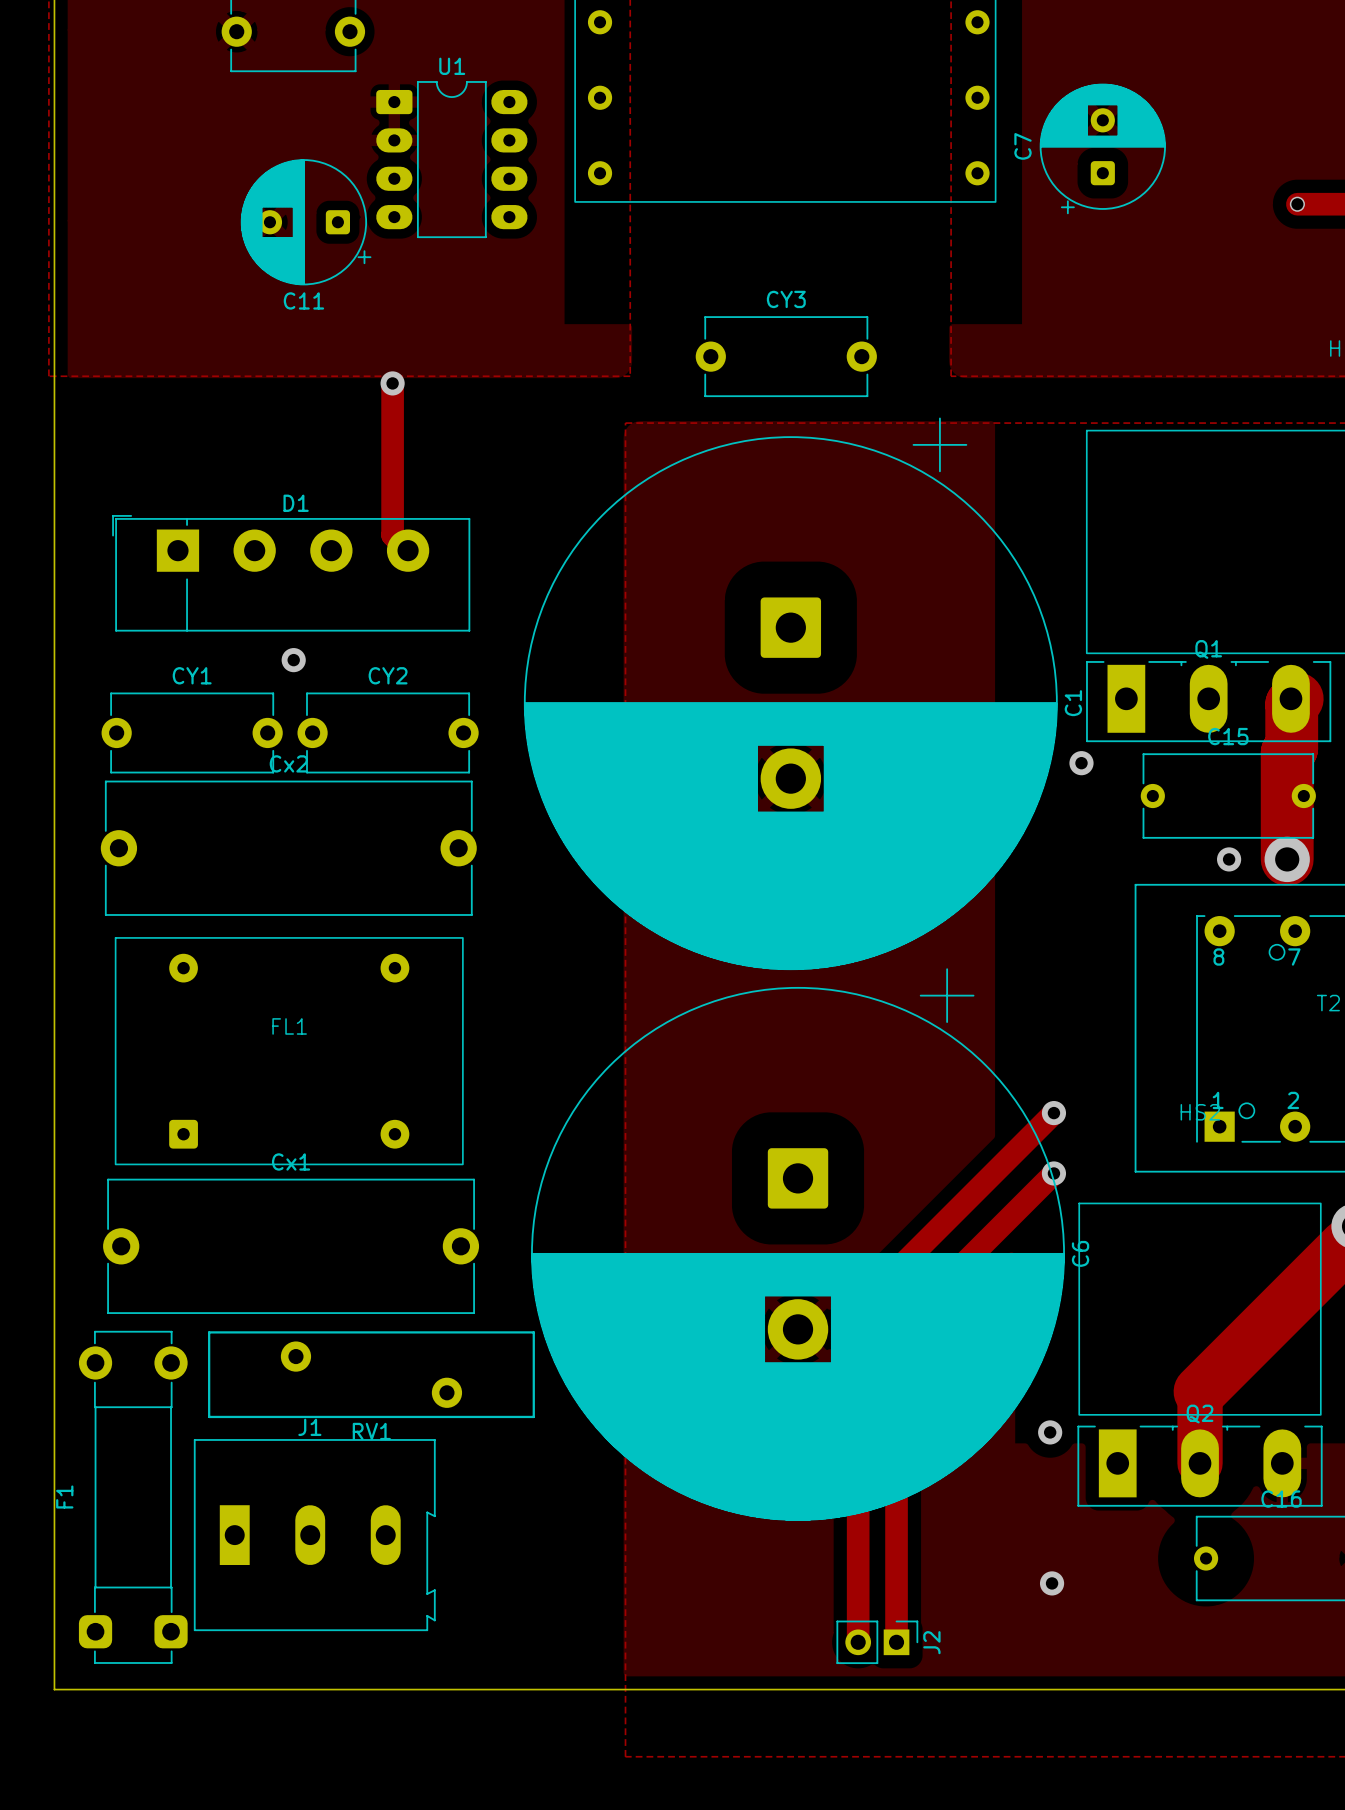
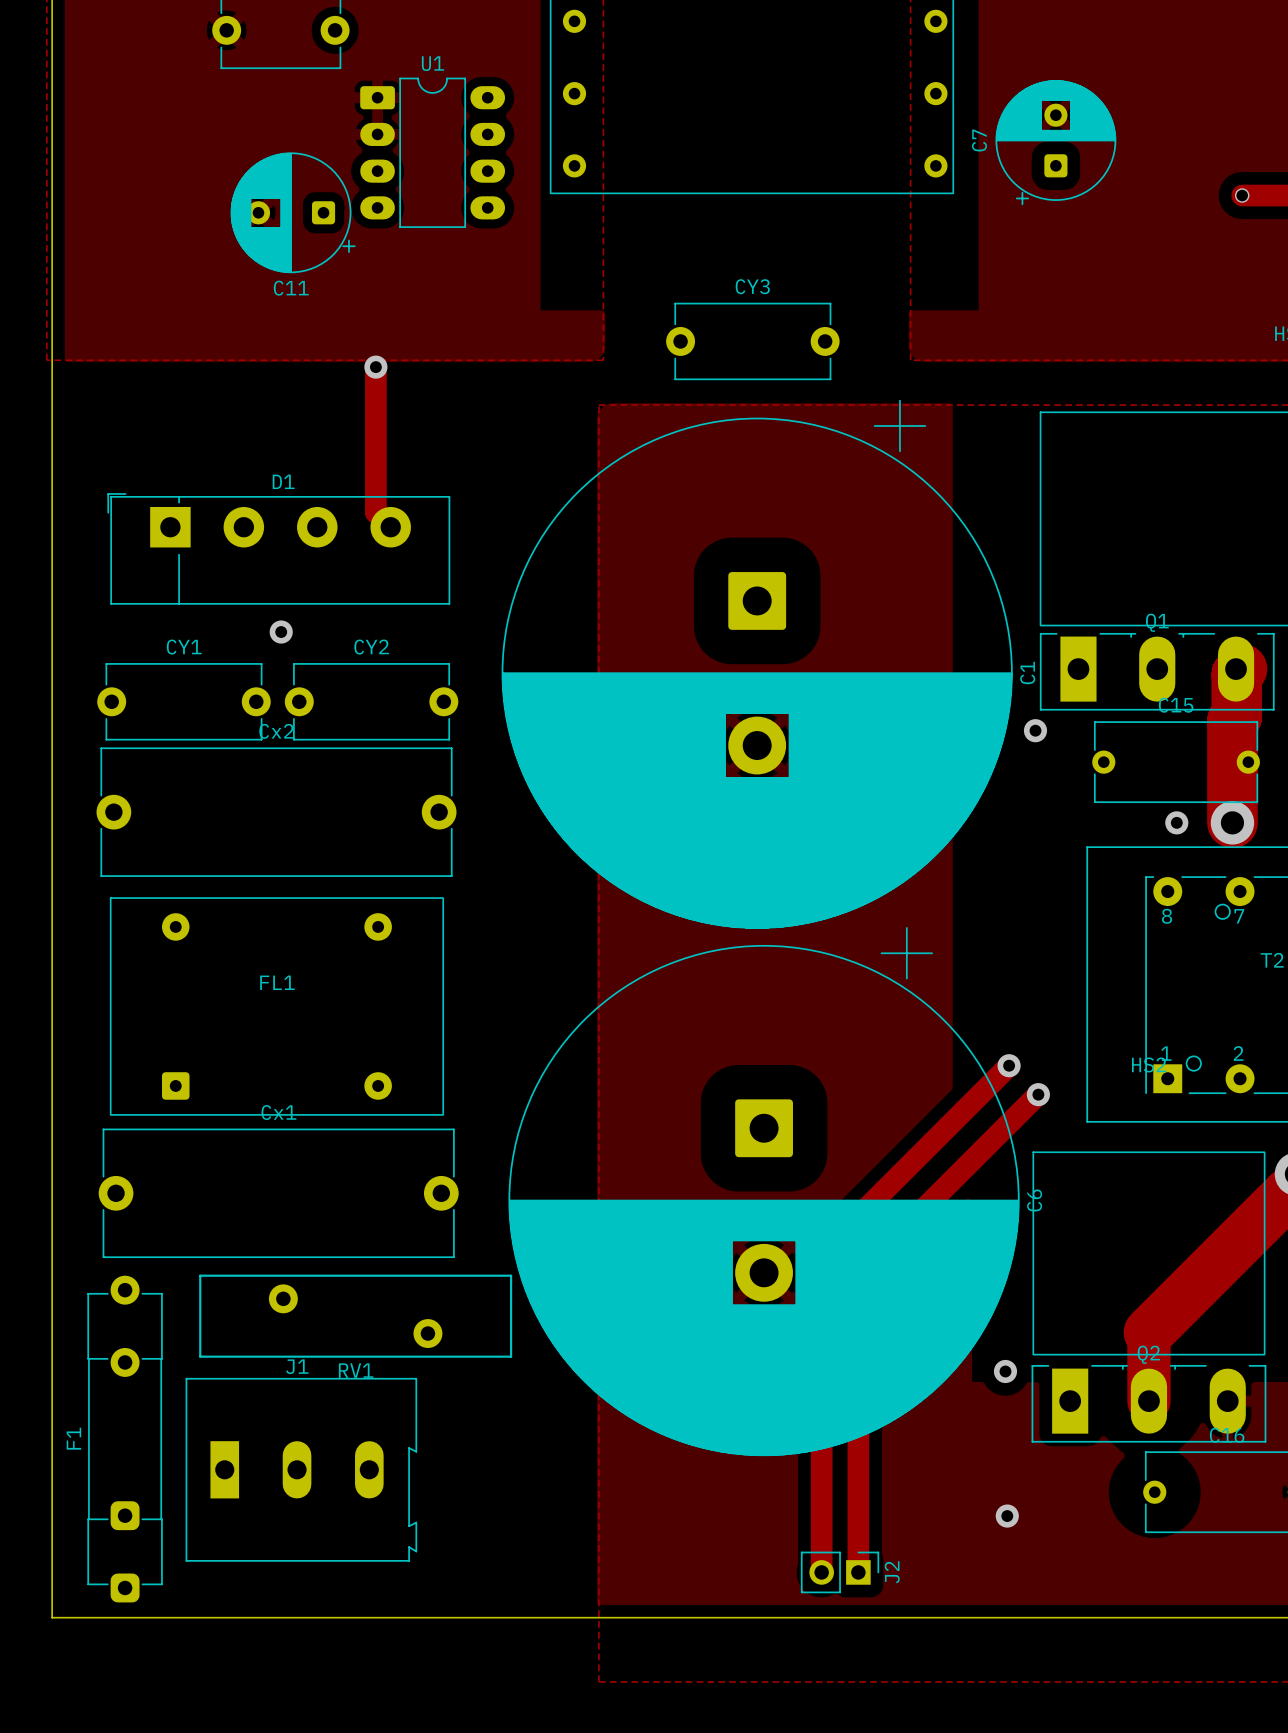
track: none -> (1038, 1094) (1009, 1123)
via position: (1053, 1173) -> (1038, 1094)
F1 footprint: [78, 1330, 188, 1664] -> [87, 1275, 163, 1603]

